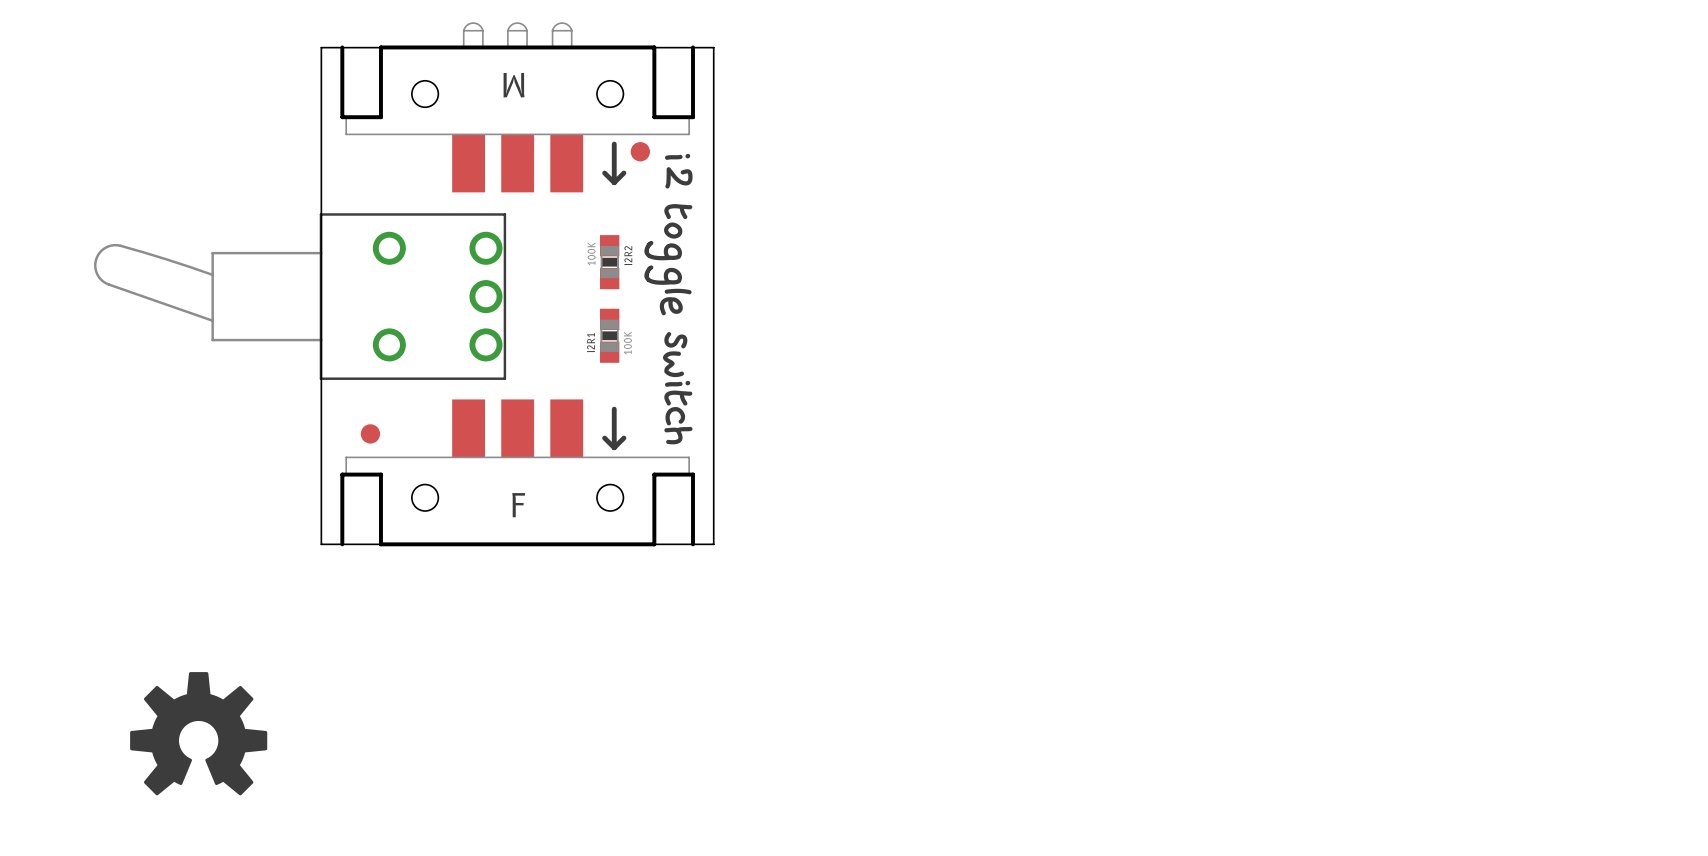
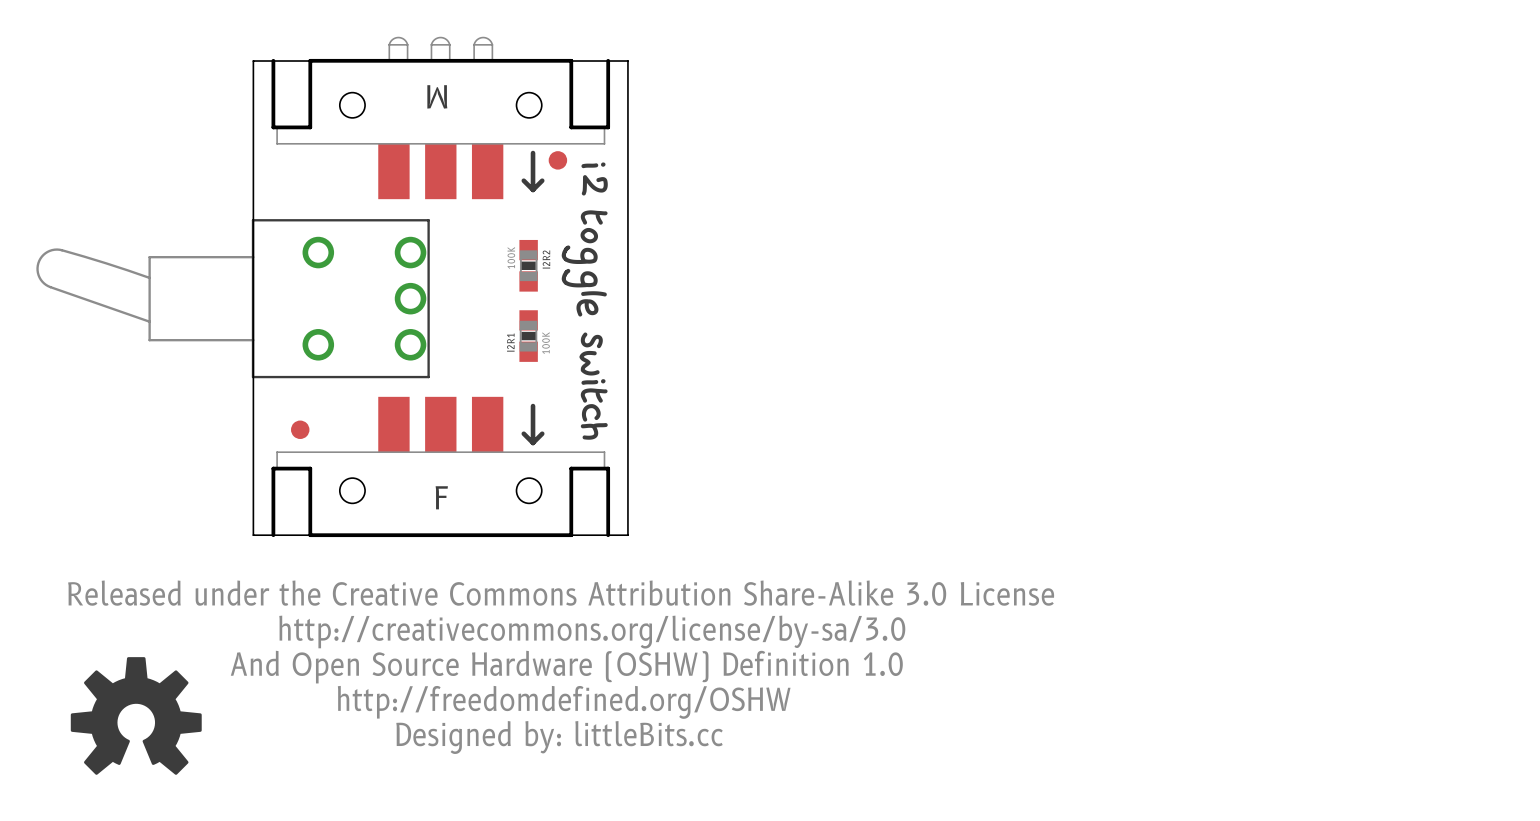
drawing: none -> [68, 580, 1055, 754]

